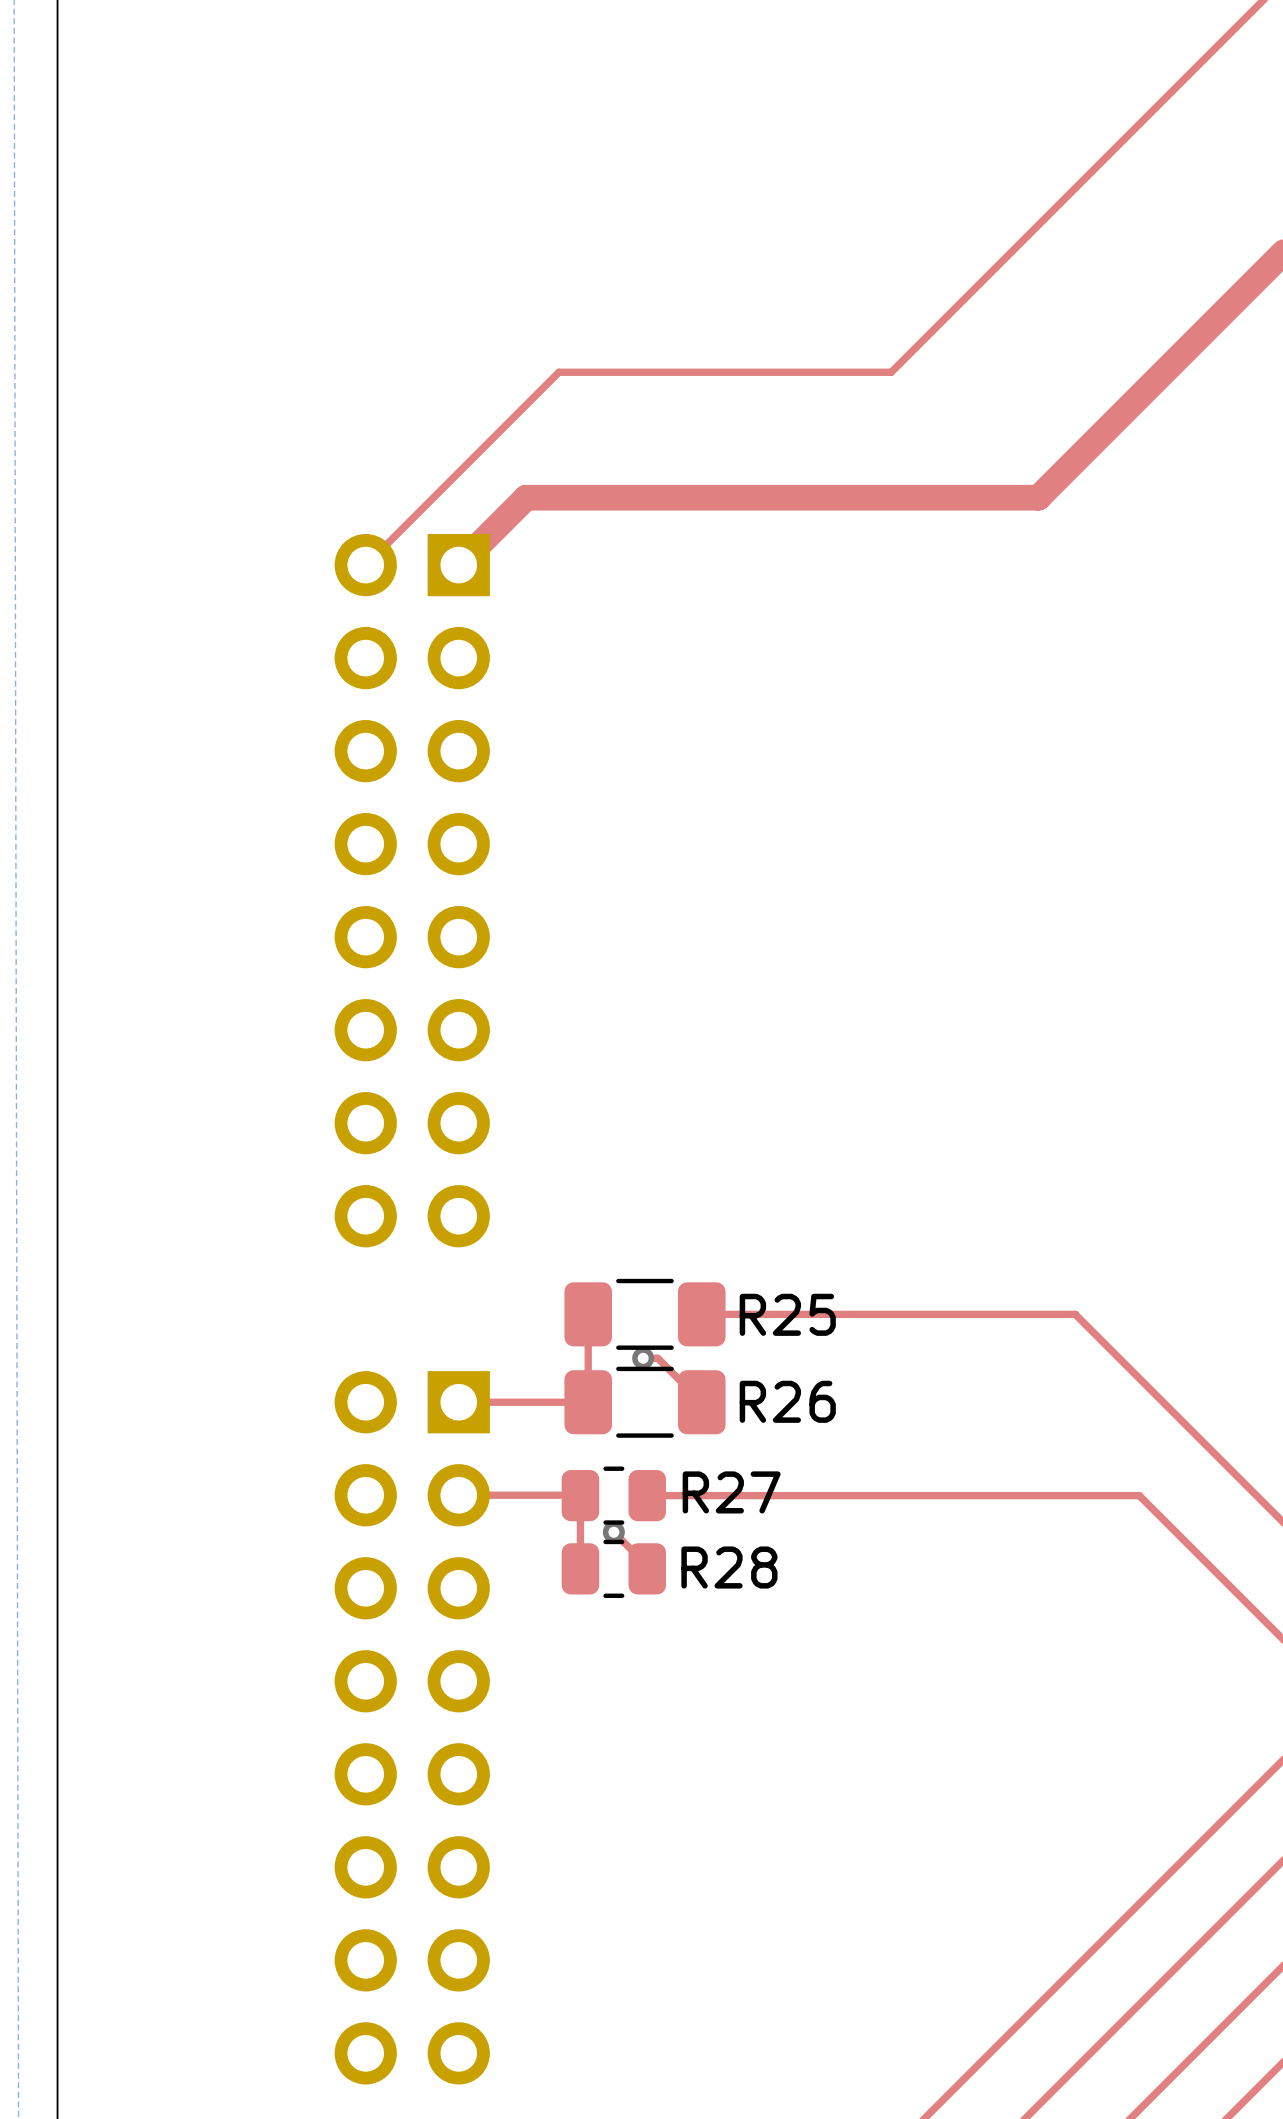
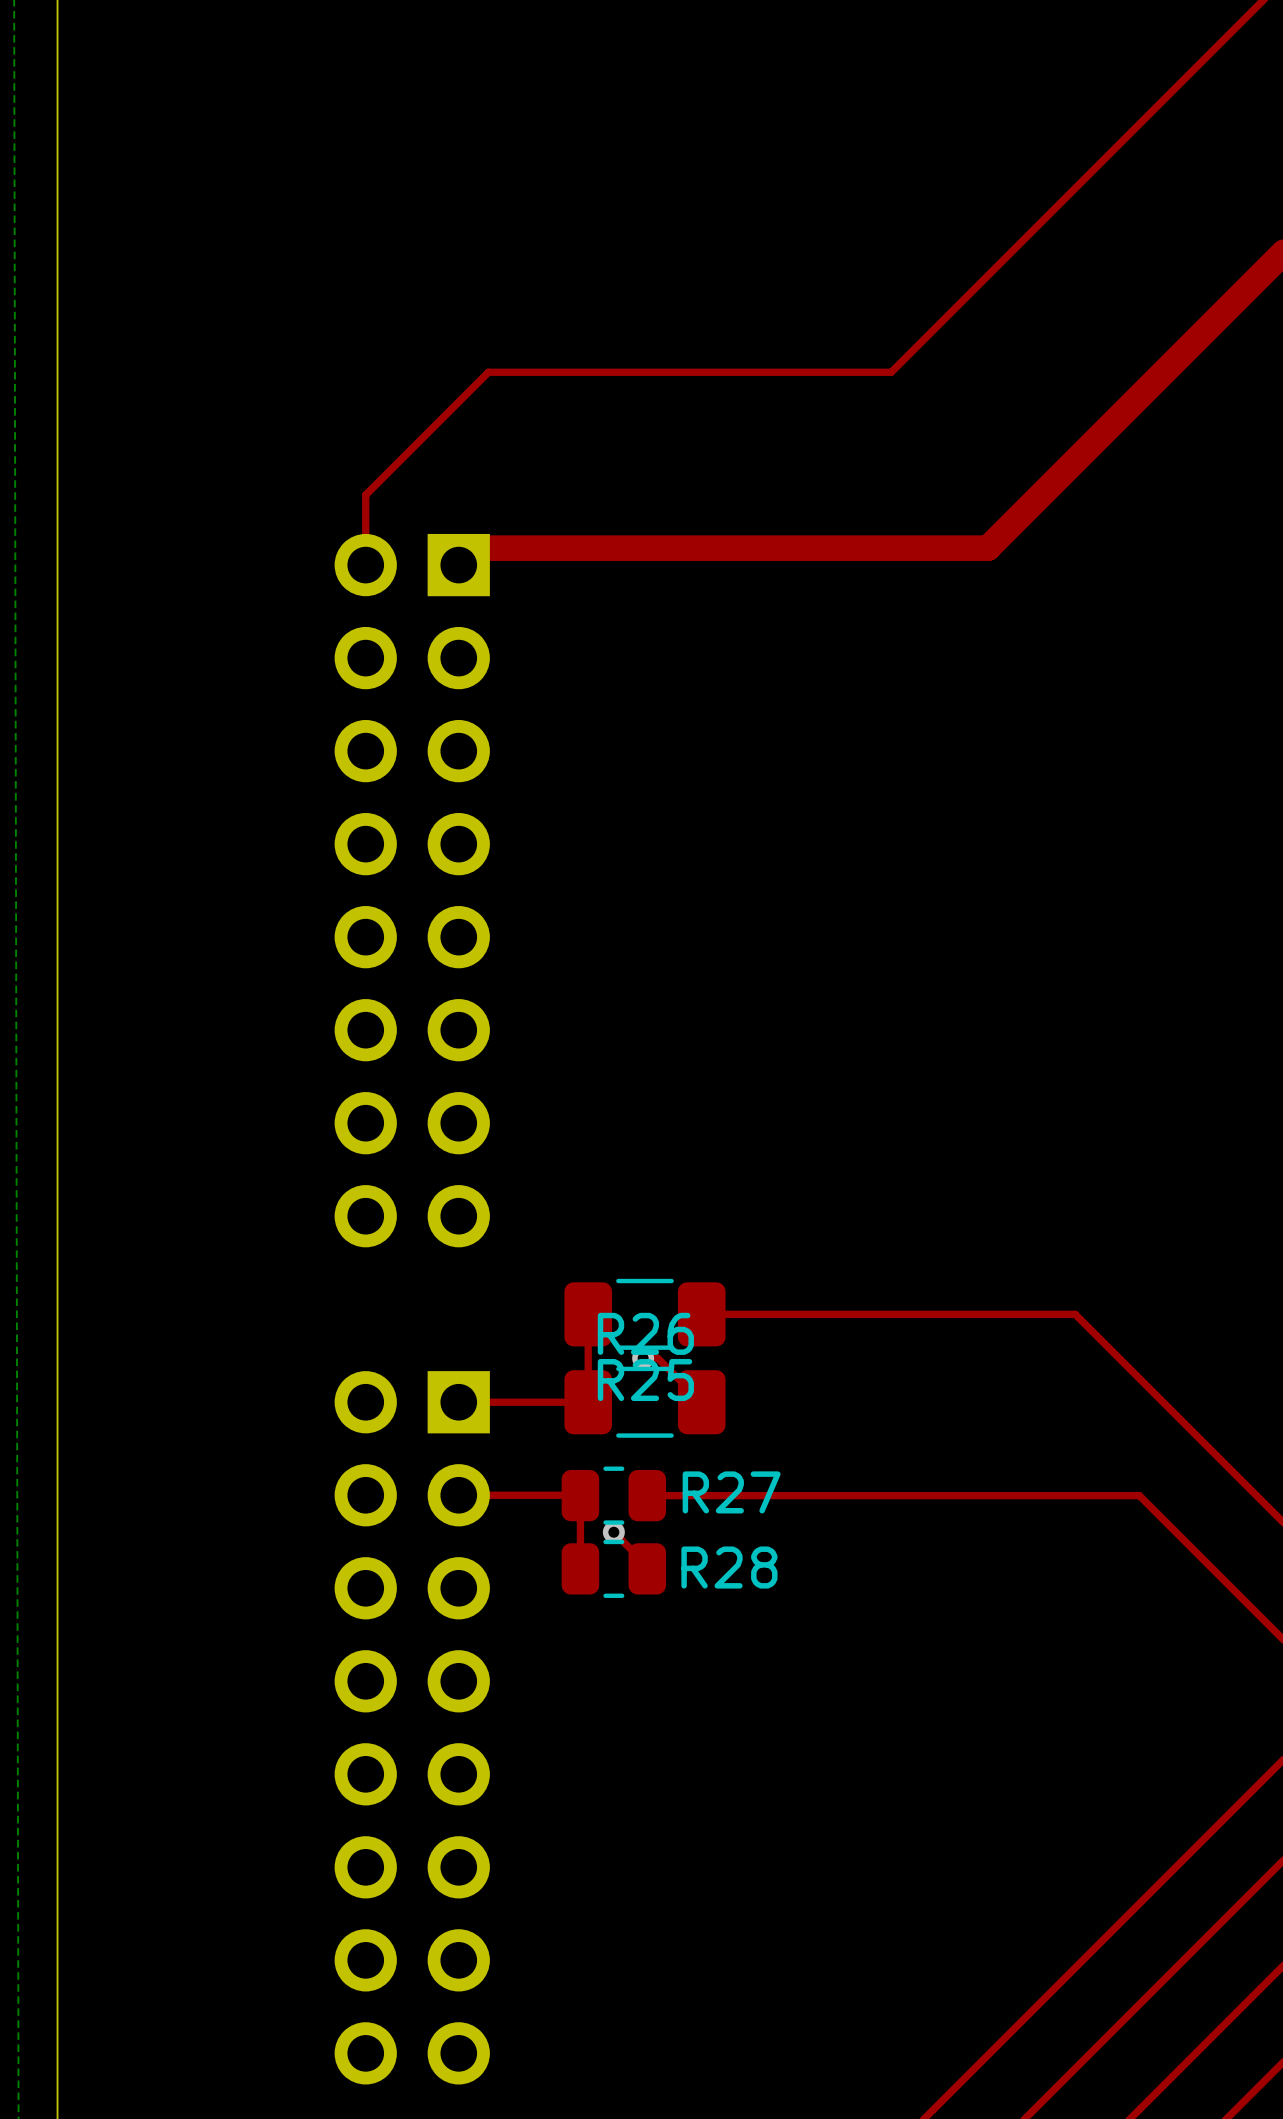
top track: (558, 372) (366, 565) -> (558, 372) (488, 372) (365, 494) (365, 565)
top track: (1038, 497) (526, 497) (475, 548) -> (1038, 497) (987, 548) (475, 548)
R25 name position: R25 (787, 1314) -> R25 (645, 1380)
R26 name position: R26 (787, 1401) -> R26 (645, 1333)

